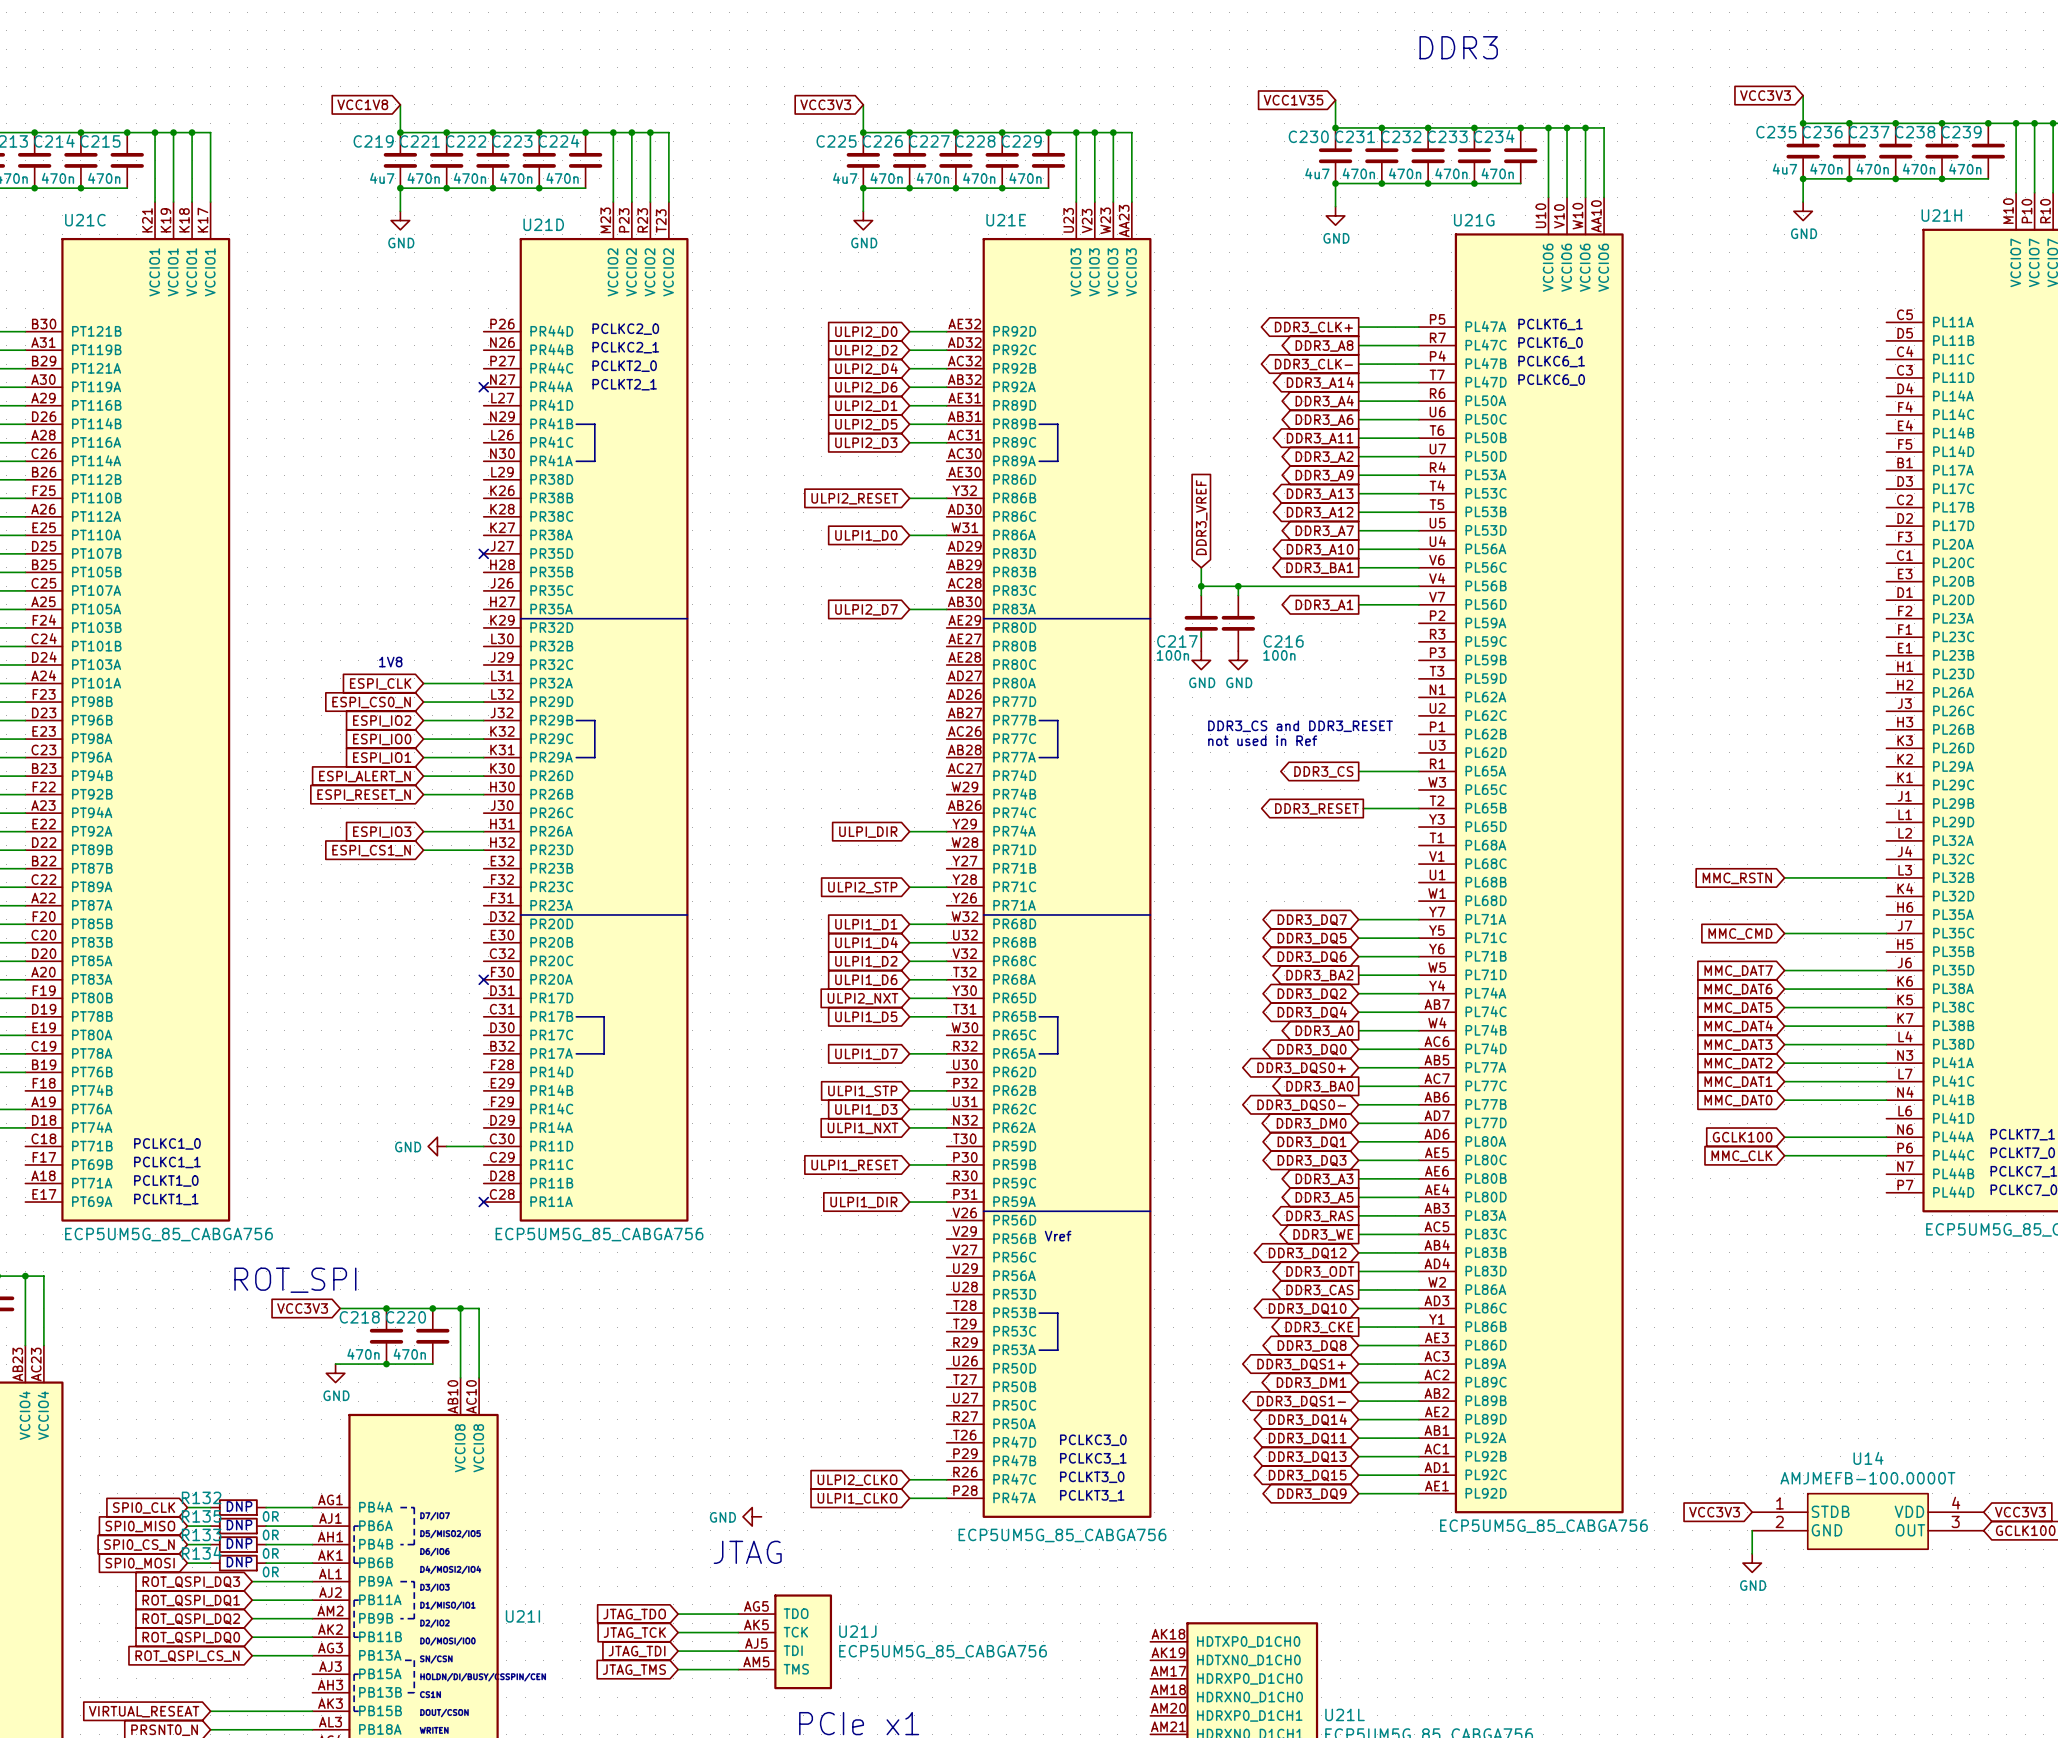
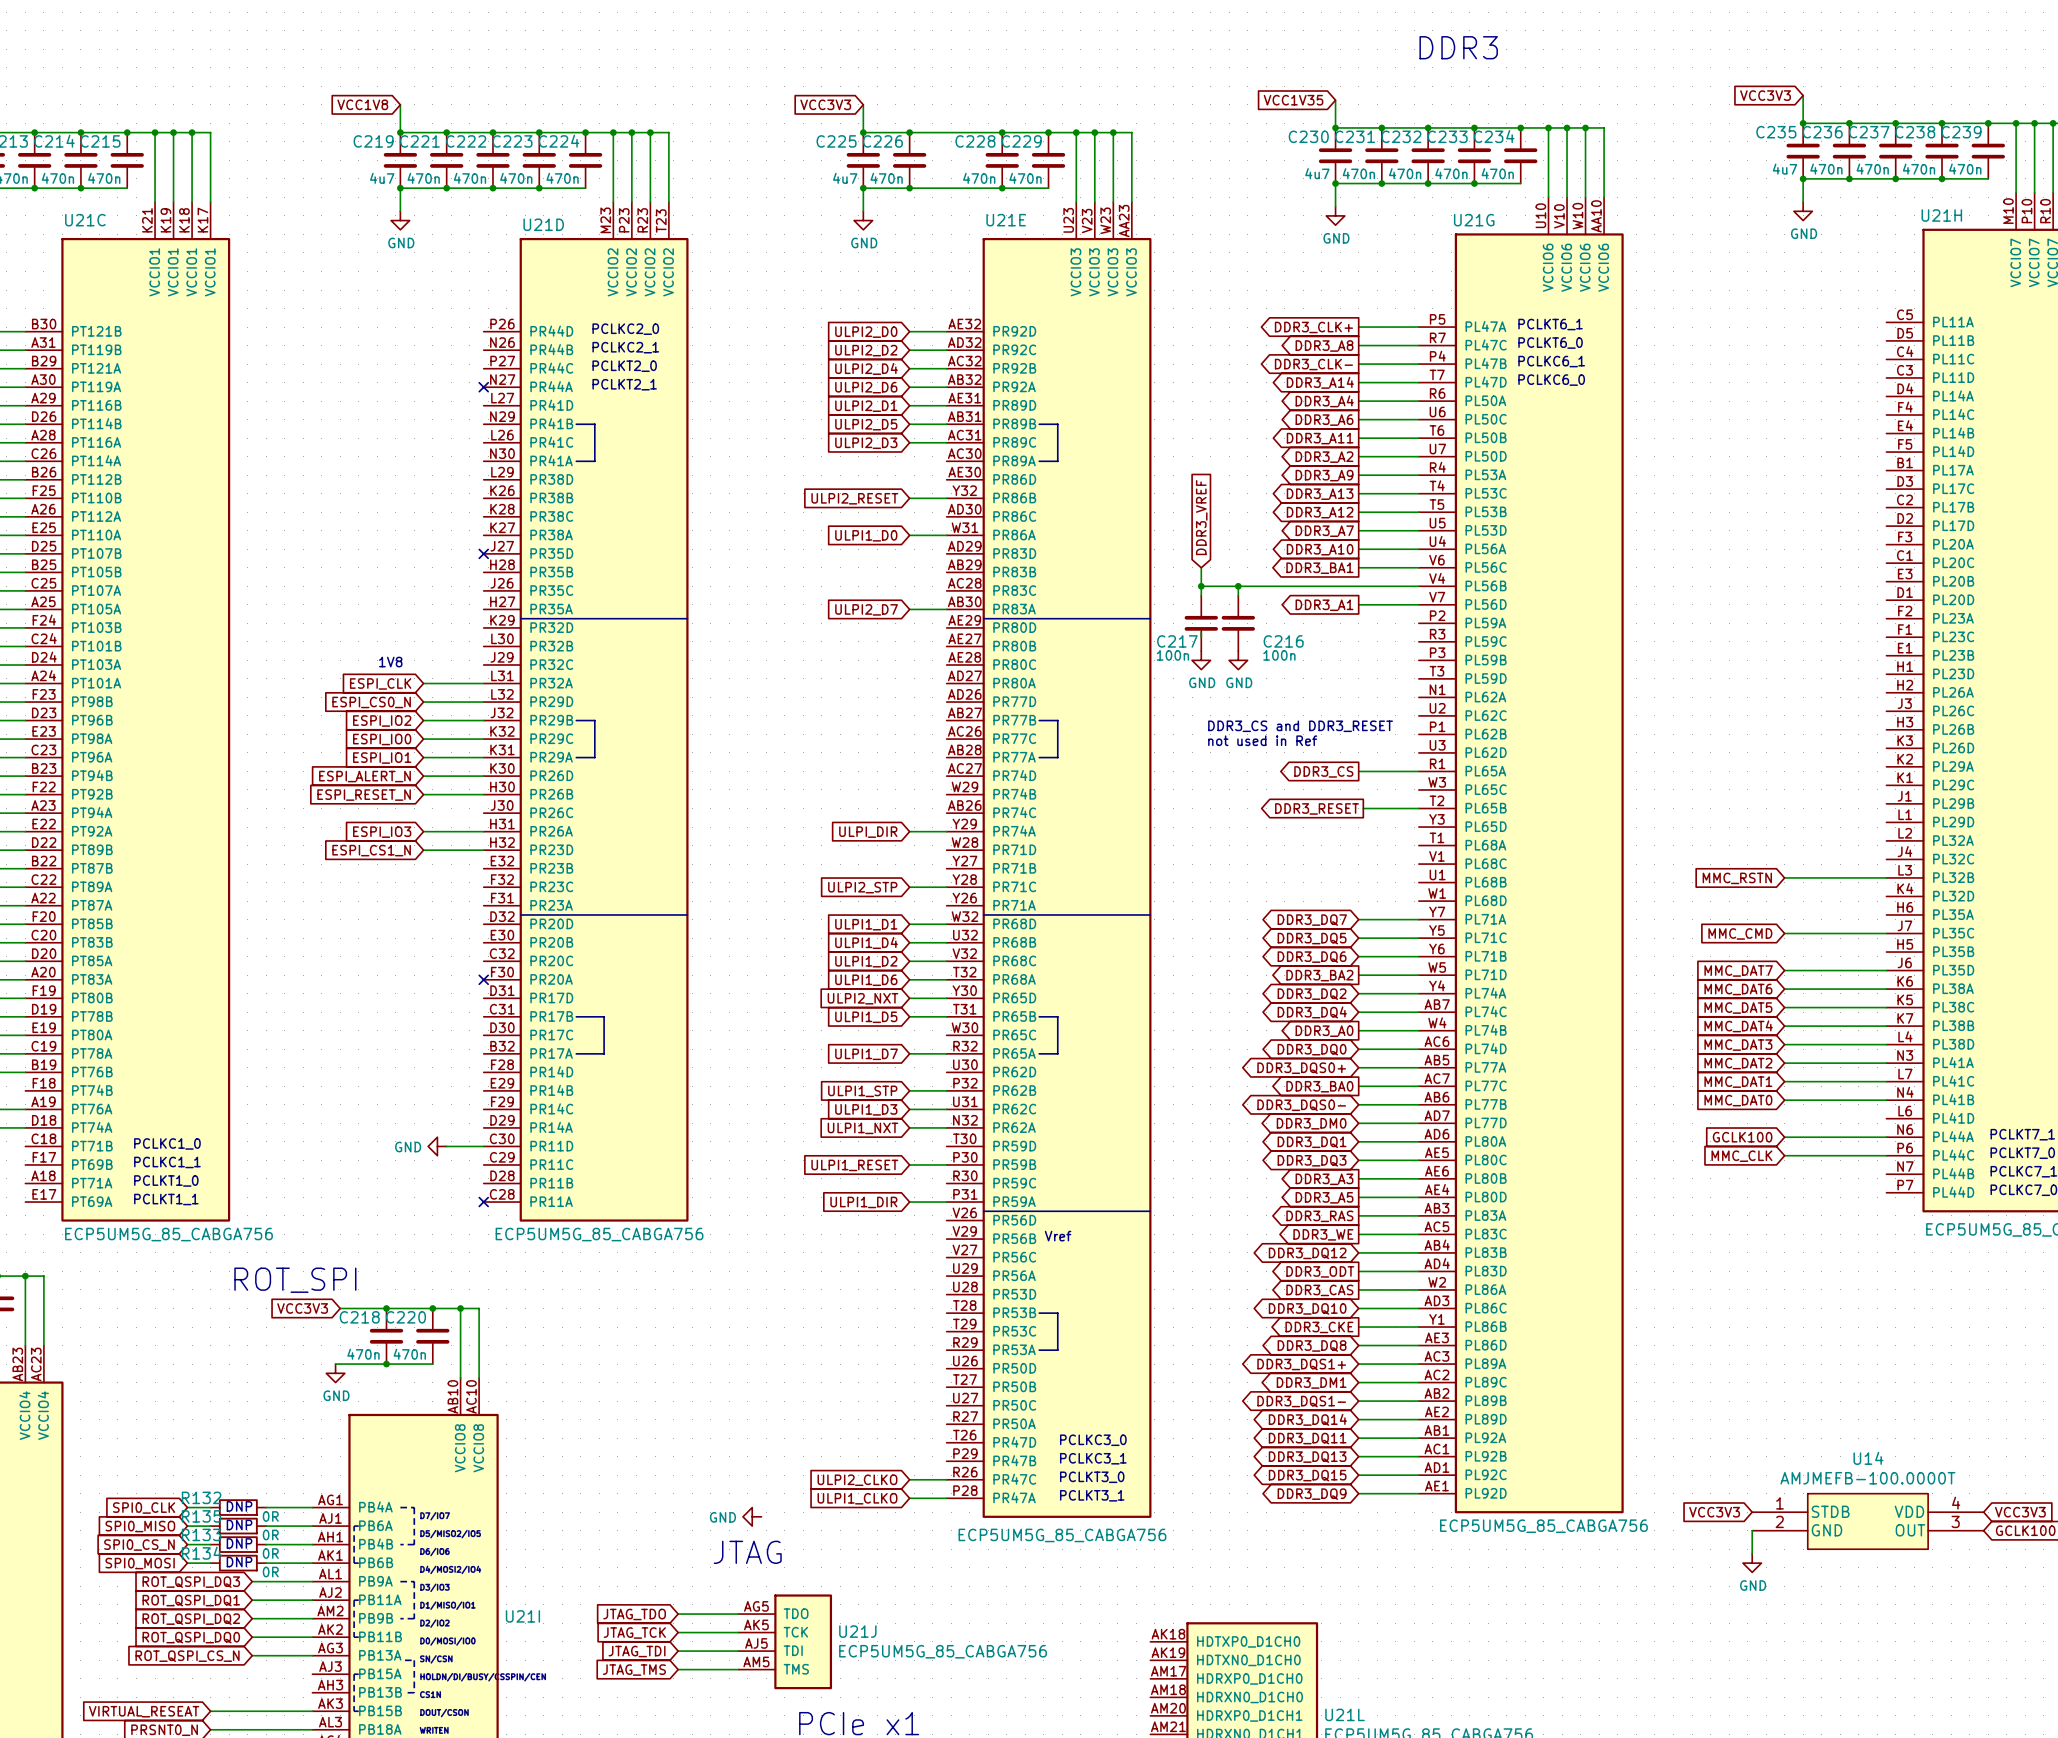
junction: (955, 132) -> none
C227: (955, 160) -> none
junction: (955, 188) -> none

